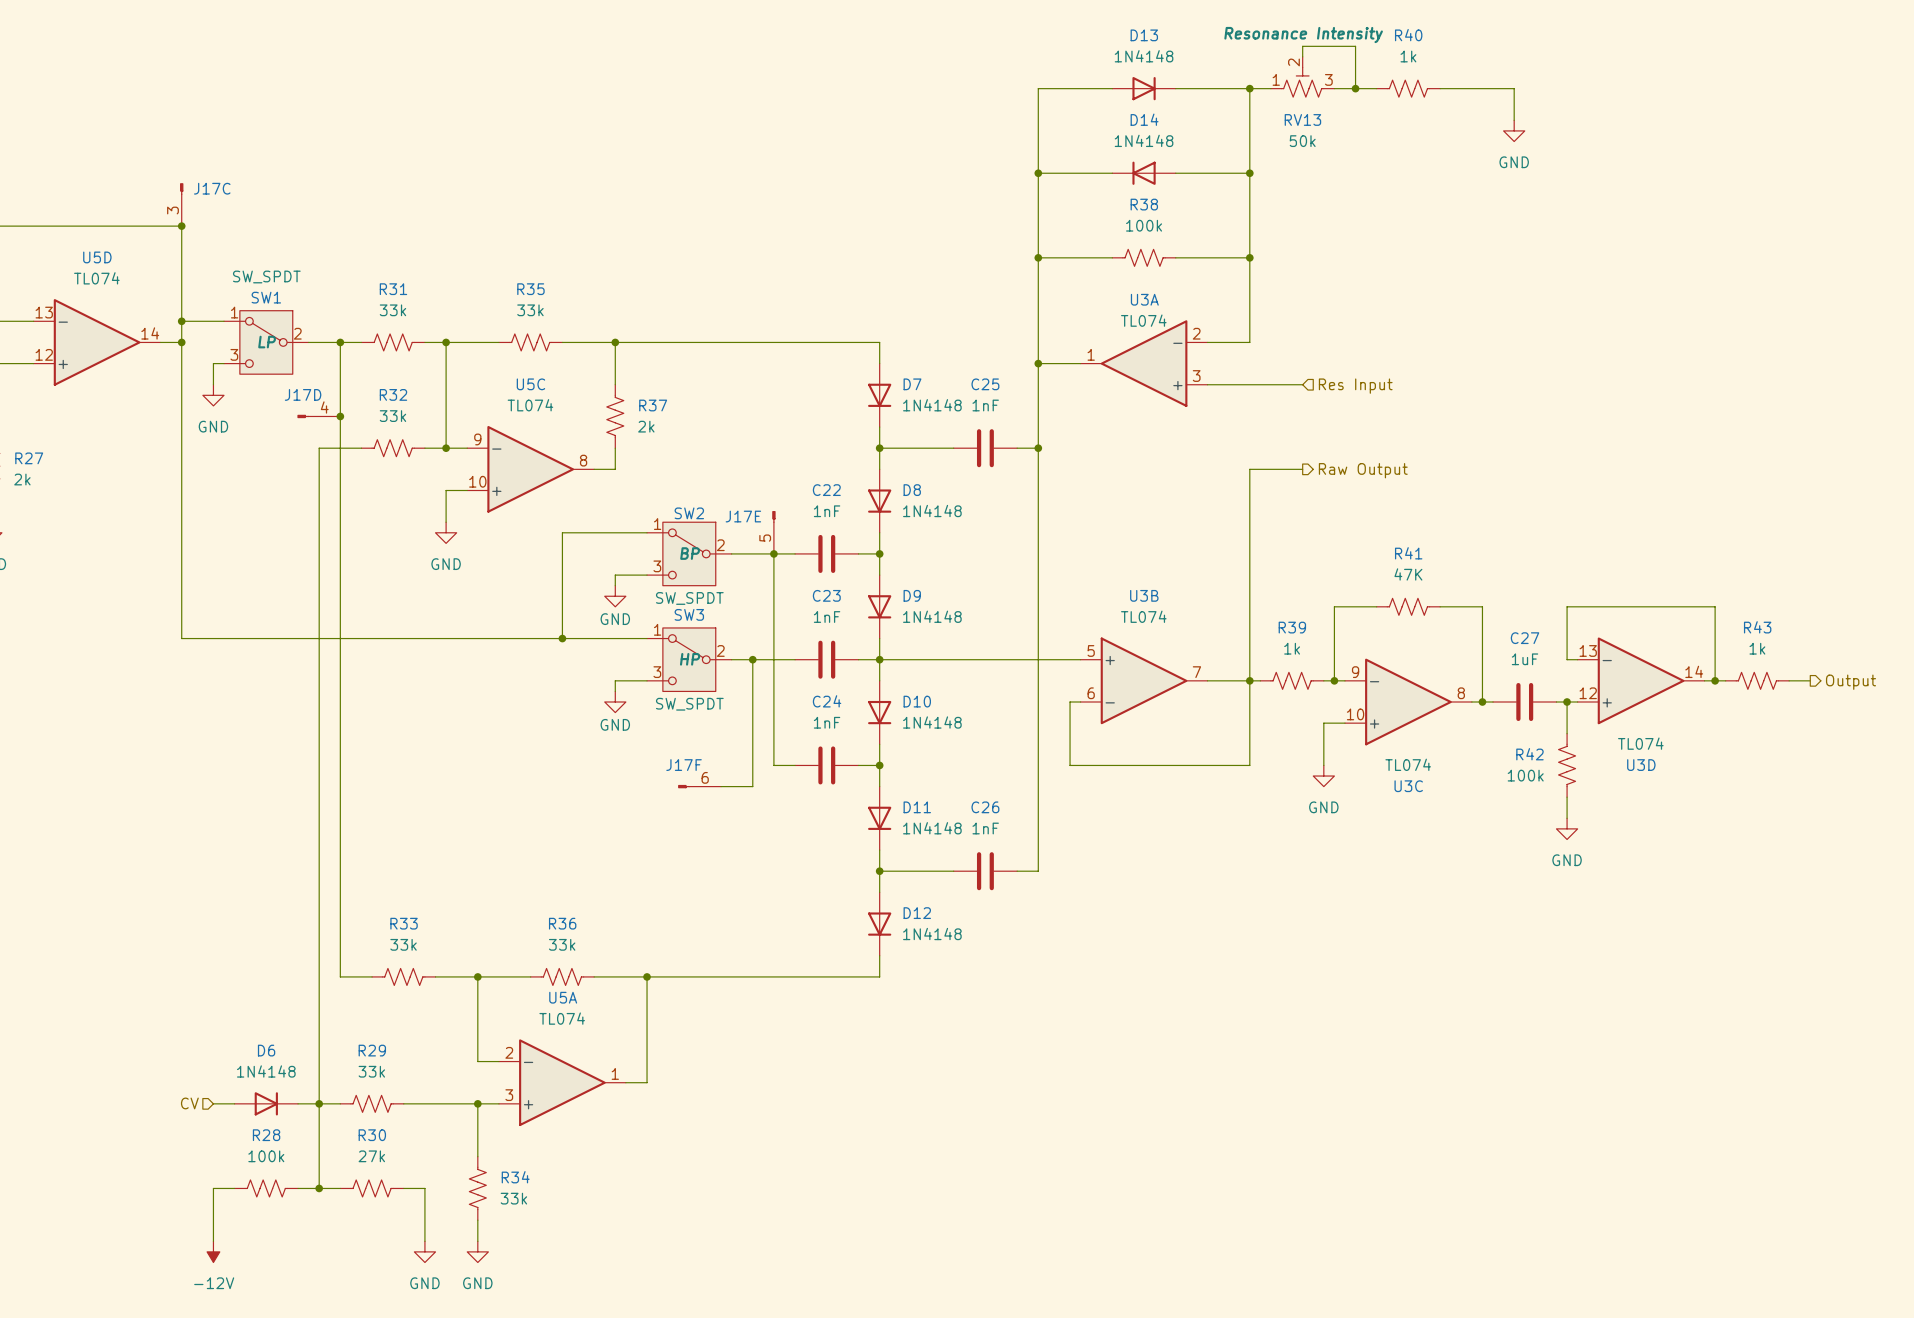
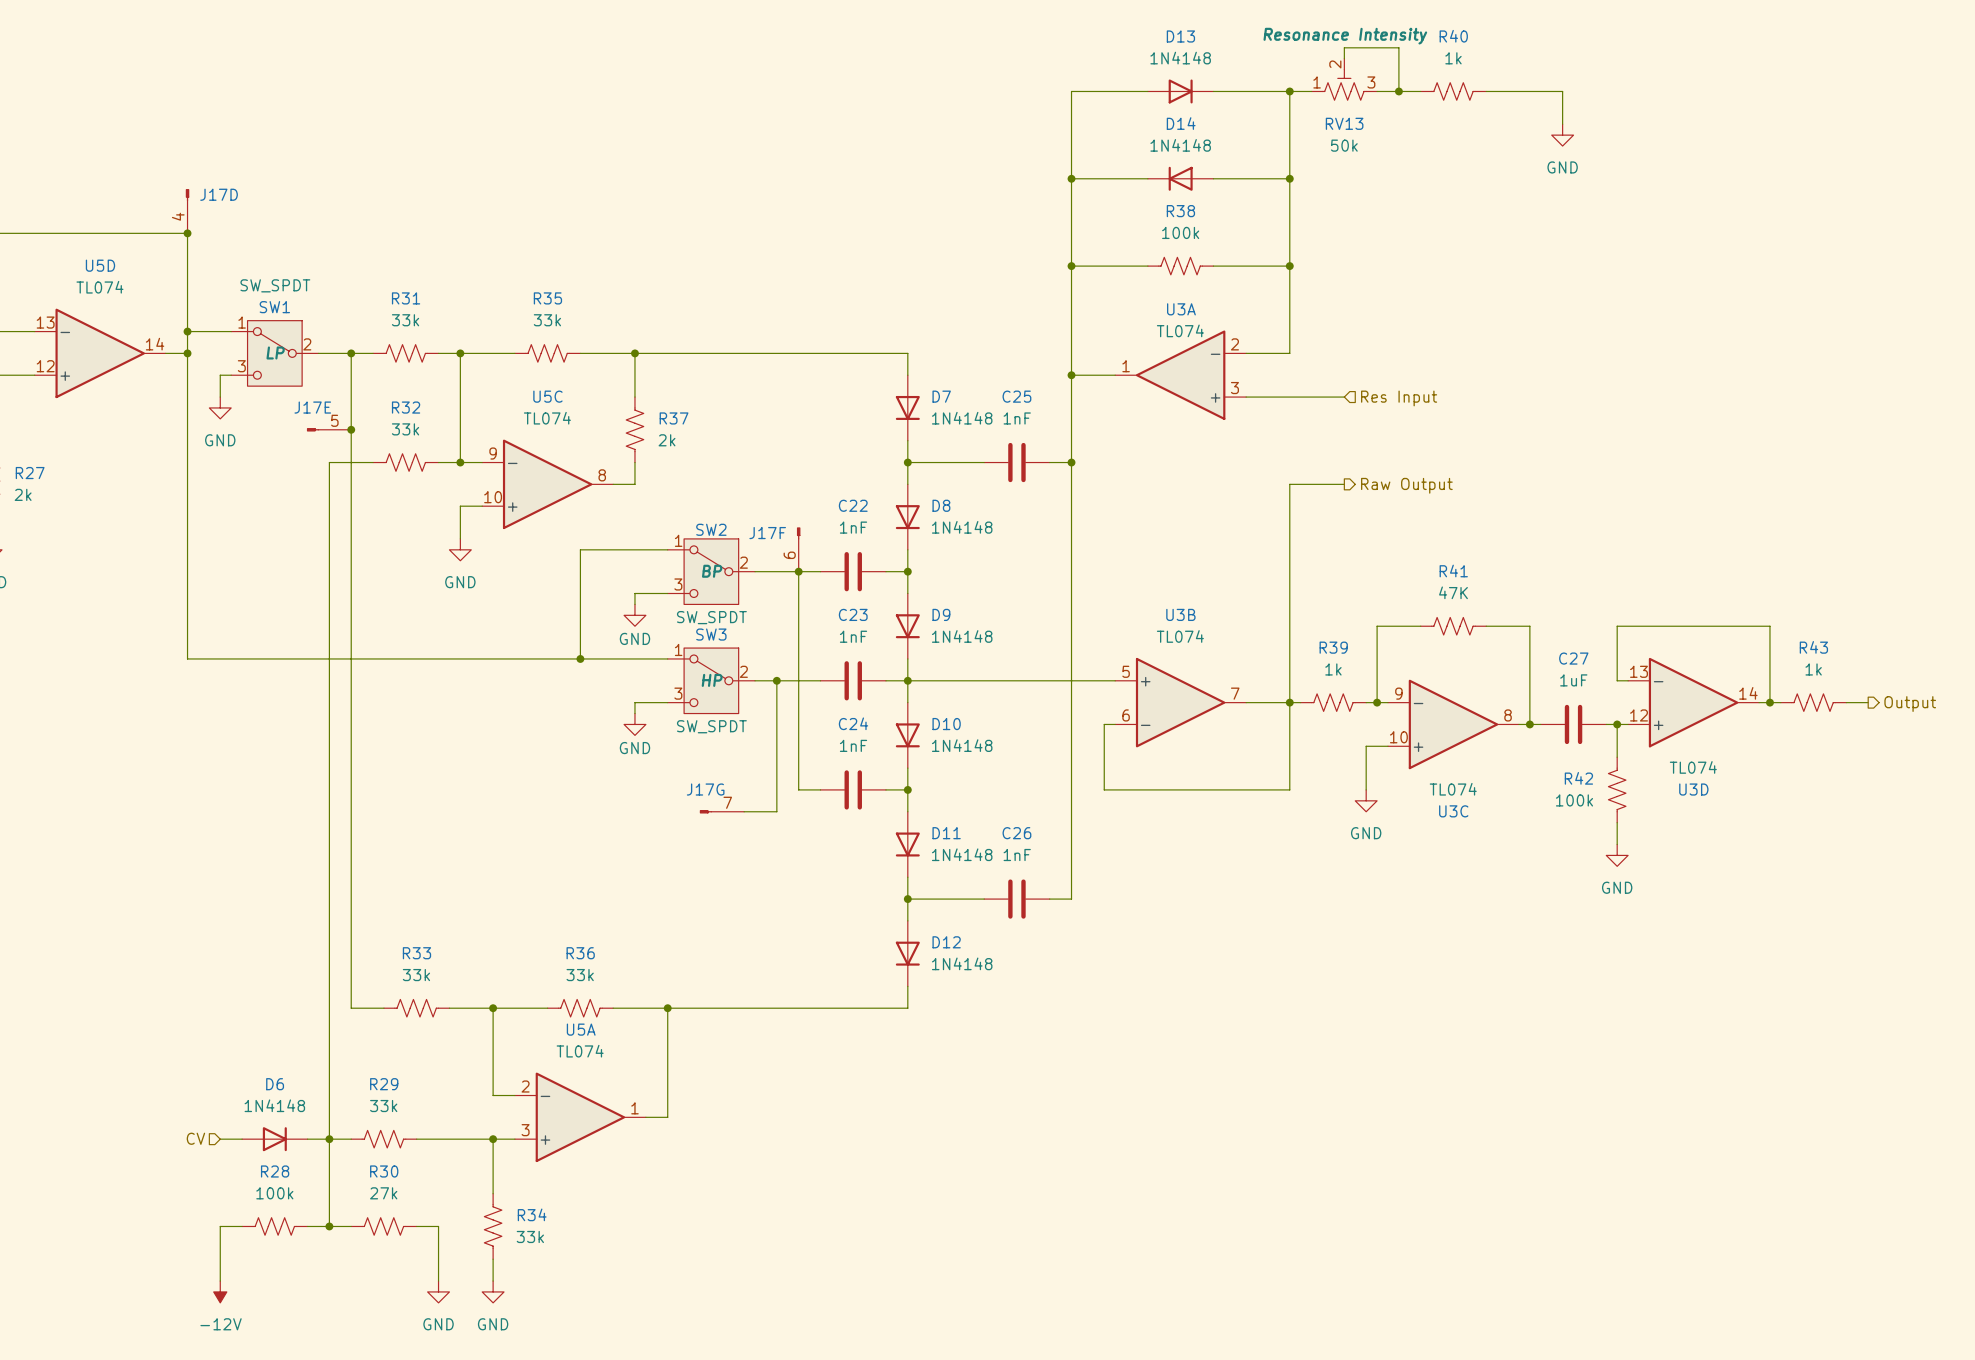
J17C: (181, 204) -> none
J17D rotation: 0° (303, 416) -> 90° clockwise (187, 195)
J17D position: (318, 416) -> (187, 211)
J17E name position: J17E (743, 516) -> J17E (312, 407)
J17E rotation: 0° (773, 516) -> 90° counterclockwise (313, 429)
J17E position: (773, 532) -> (329, 429)
J17F name position: J17F (684, 765) -> J17F (767, 533)
J17F rotation: 0° (684, 786) -> 90° clockwise (798, 533)
J17F position: (699, 786) -> (798, 549)
J17G: none -> (721, 811)

